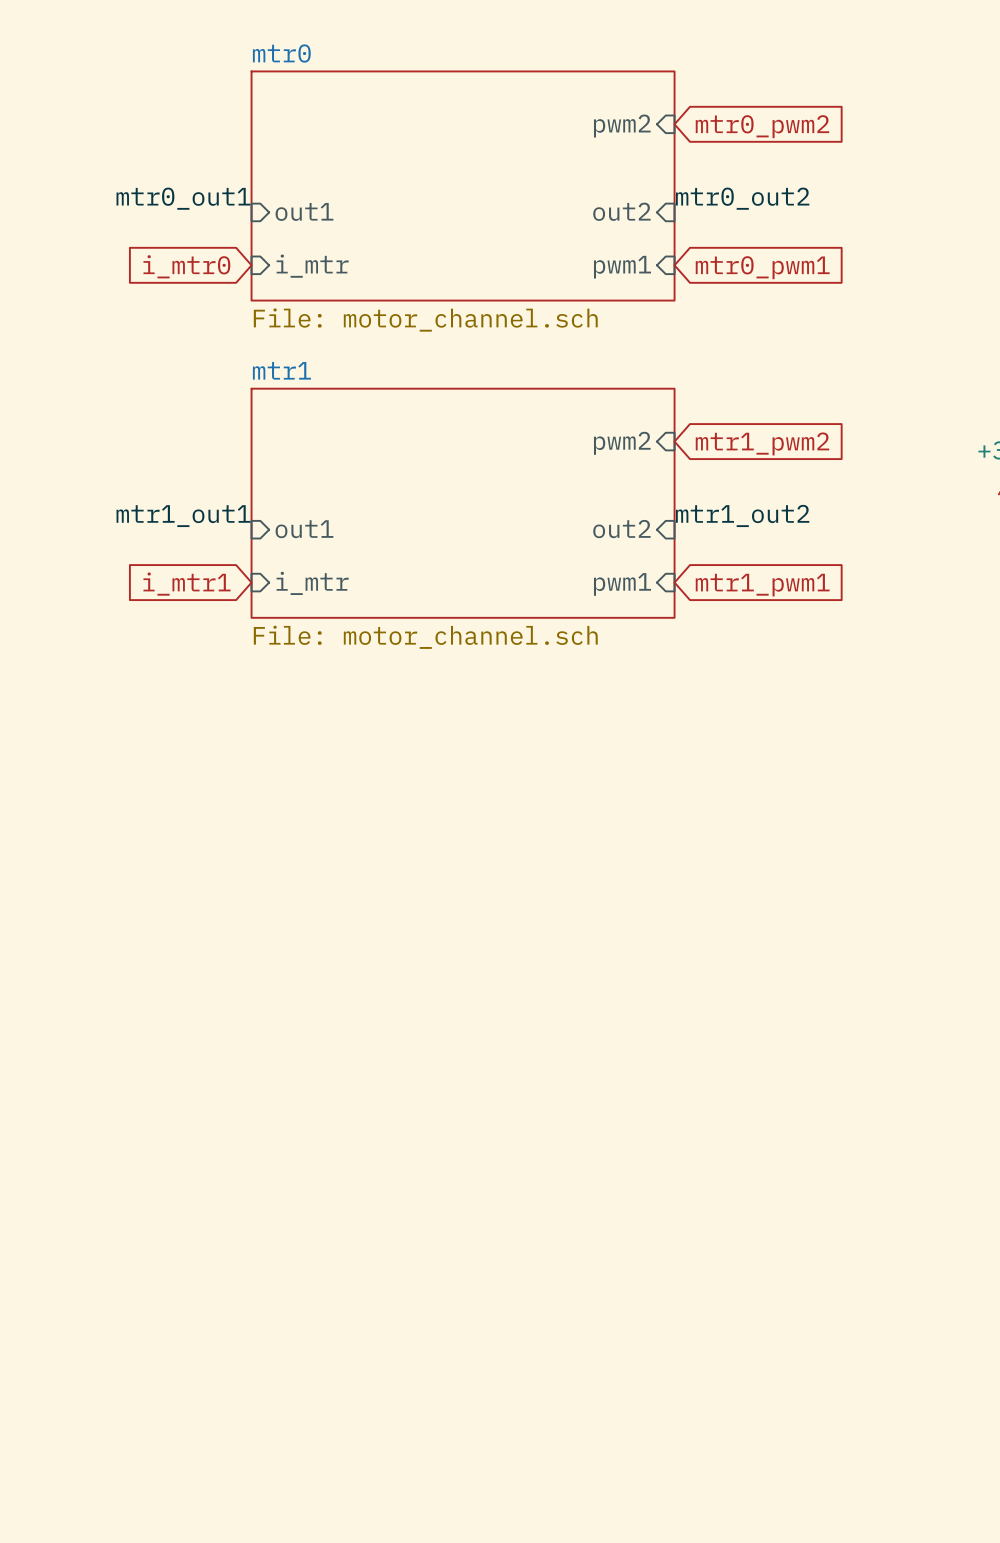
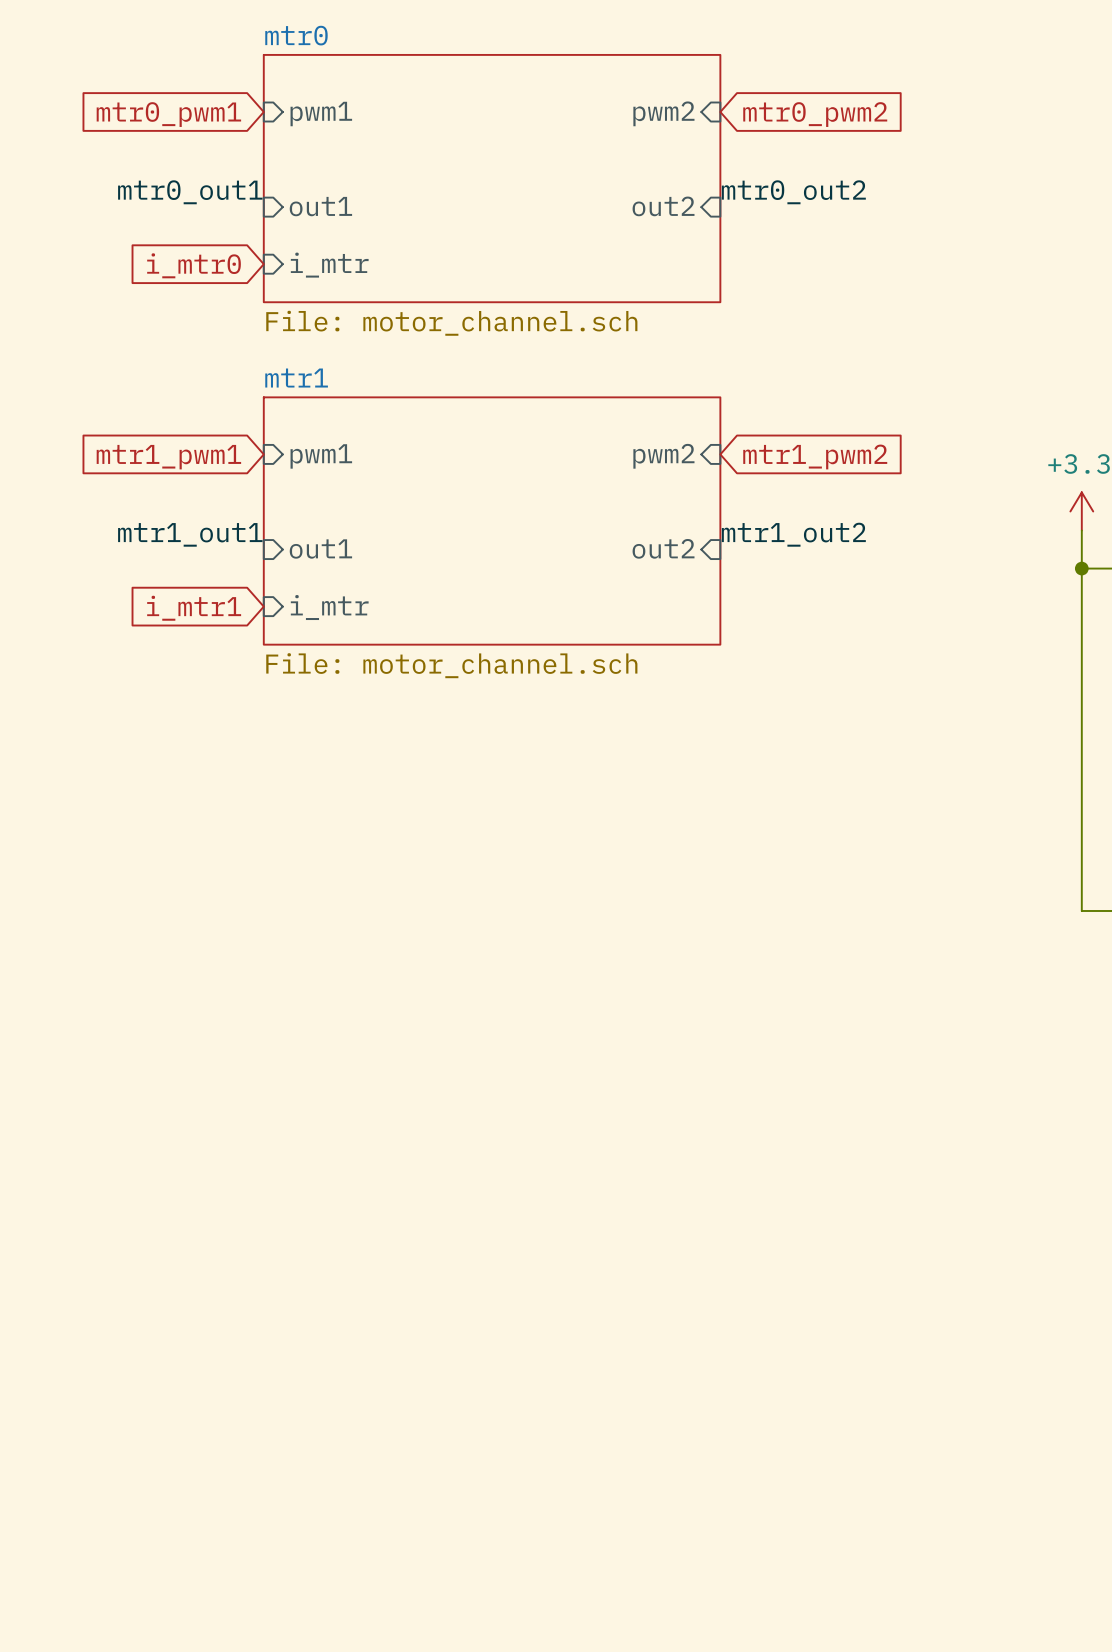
global label: none -> mtr0_pwm1 (168, 114)
sheet pin: none -> pwm1 (321, 114)
sheet pin: pwm1 (622, 267) -> none
global label: mtr0_pwm1 (762, 267) -> none
sheet pin: none -> pwm1 (321, 456)
global label: none -> mtr1_pwm1 (168, 457)
sheet pin: pwm1 (622, 584) -> none
global label: mtr1_pwm1 (762, 585) -> none

